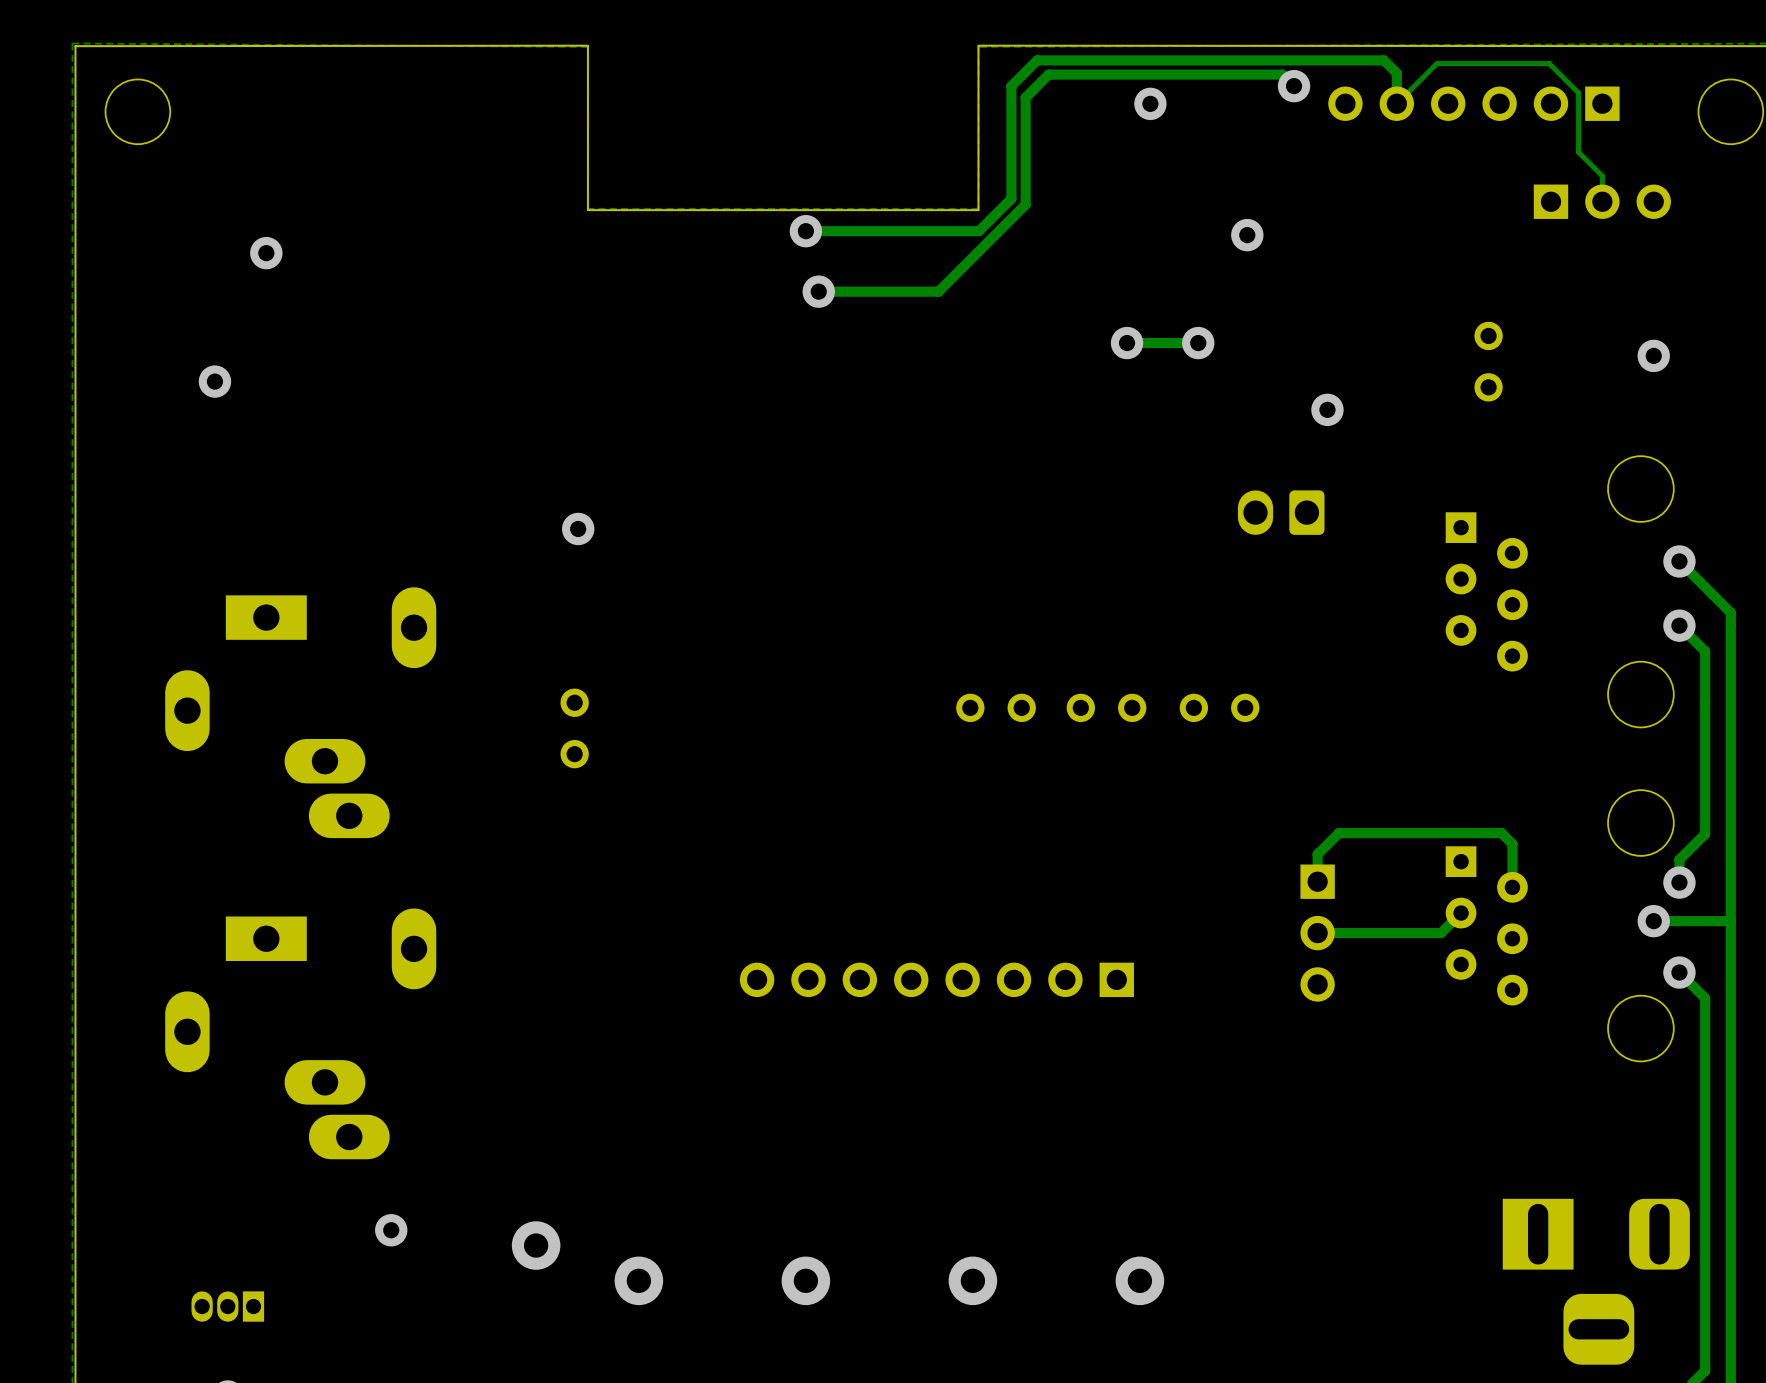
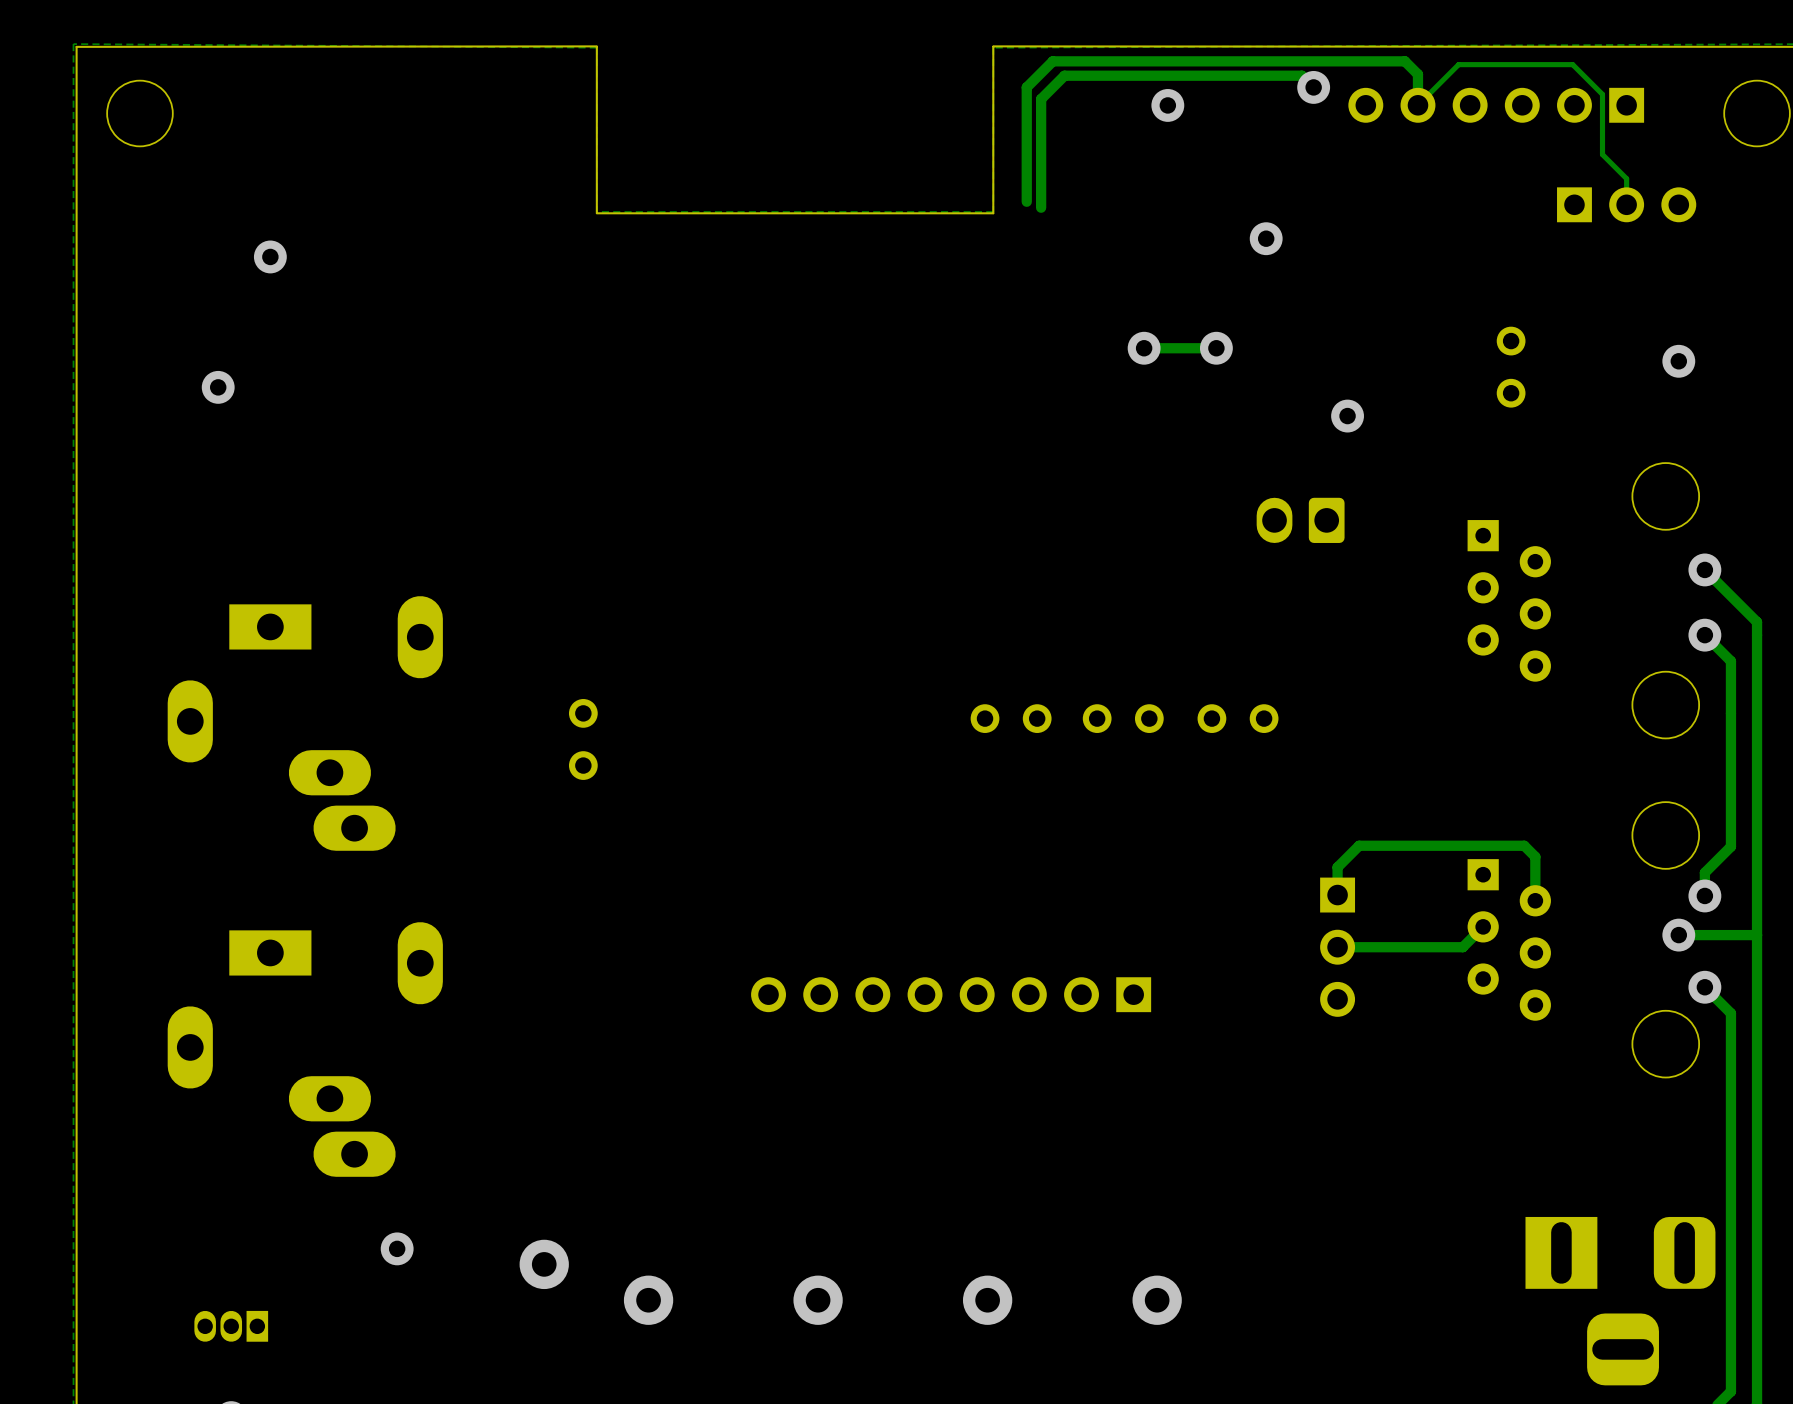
track: (1011, 198) (979, 231) (805, 231) -> none
track: (1025, 204) (938, 291) (818, 291) -> none
via: (805, 231) -> none
via: (818, 291) -> none
via: (578, 528) -> none

